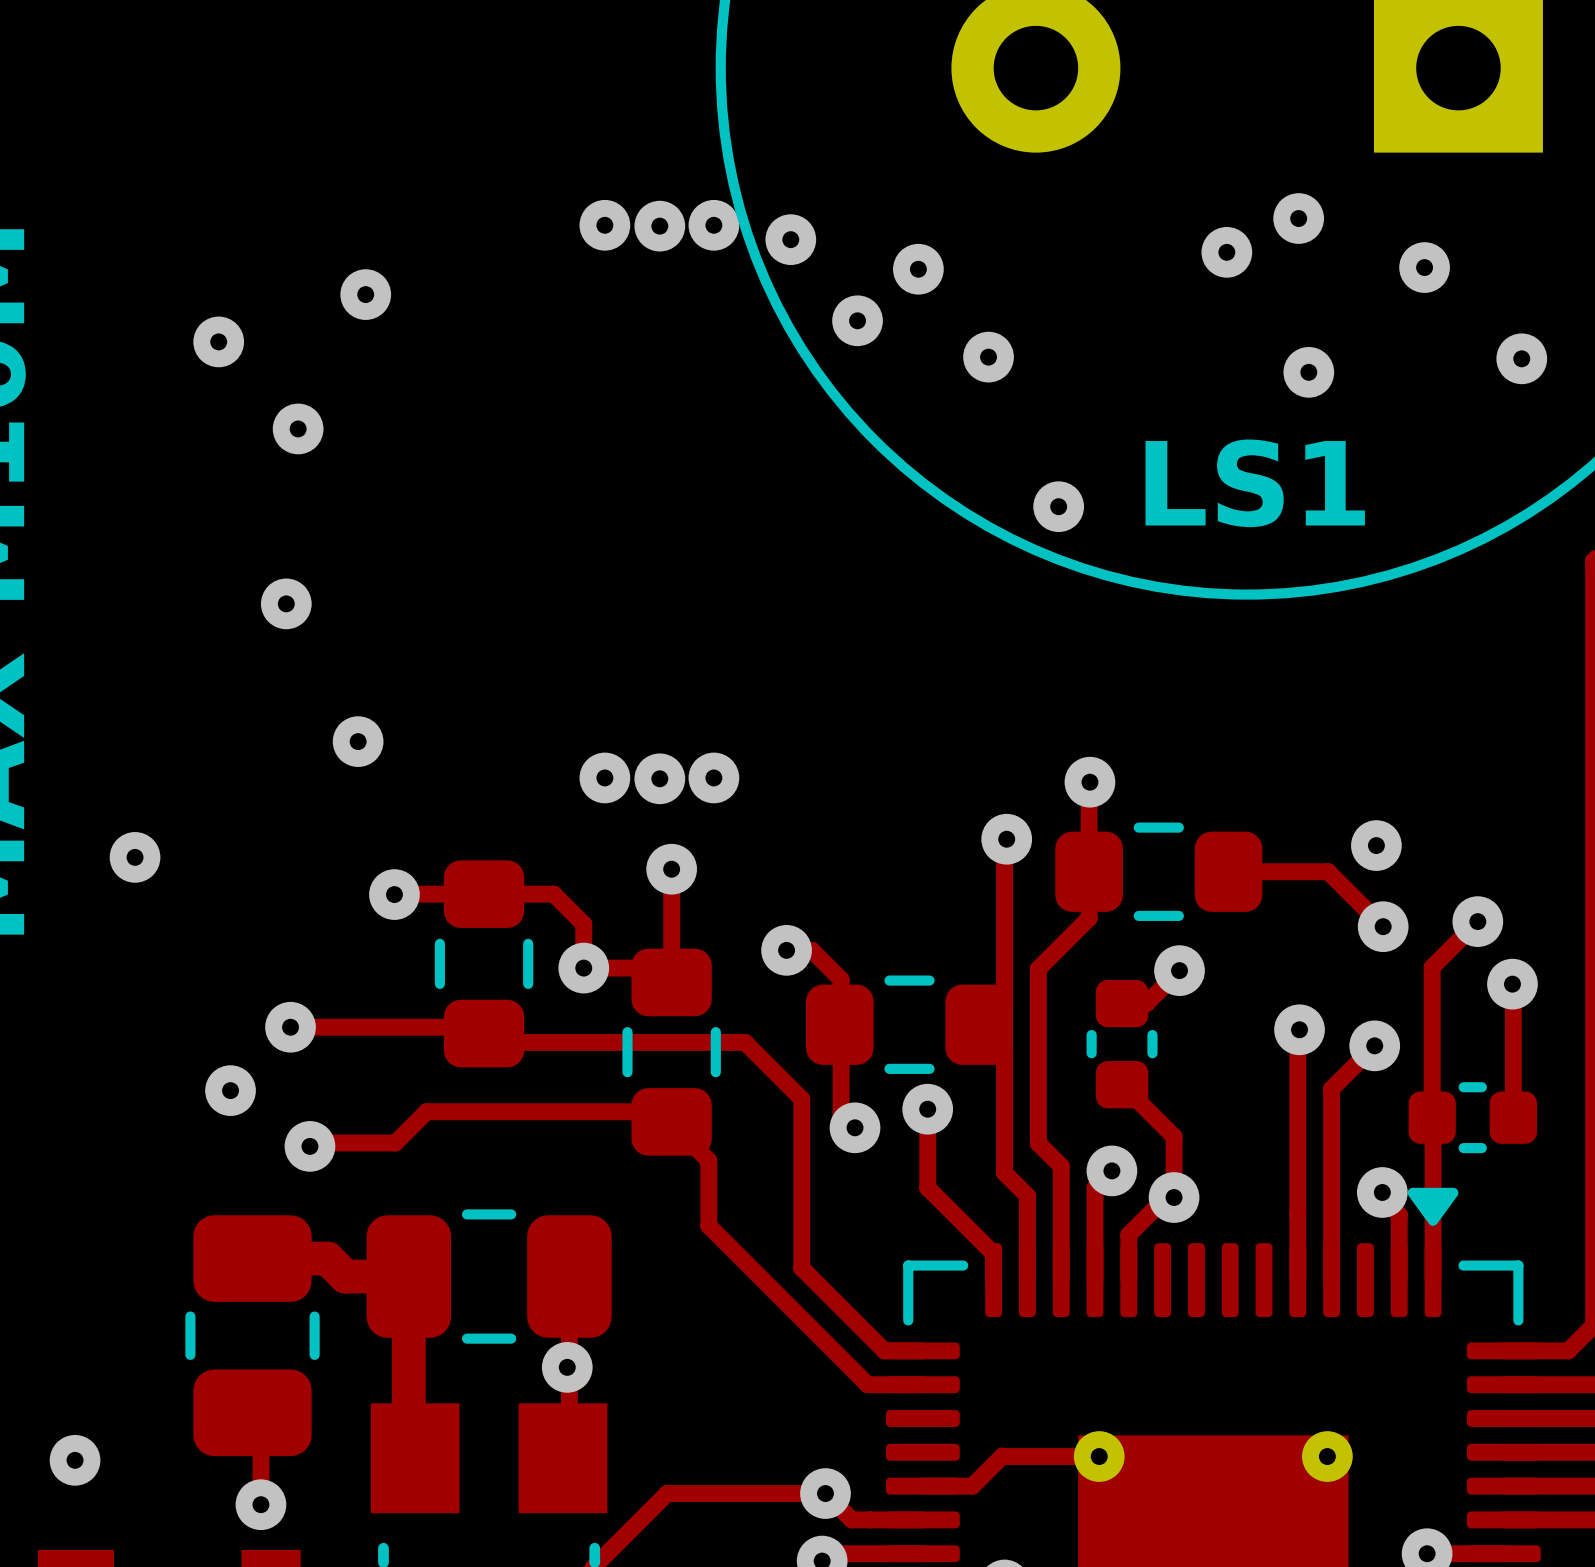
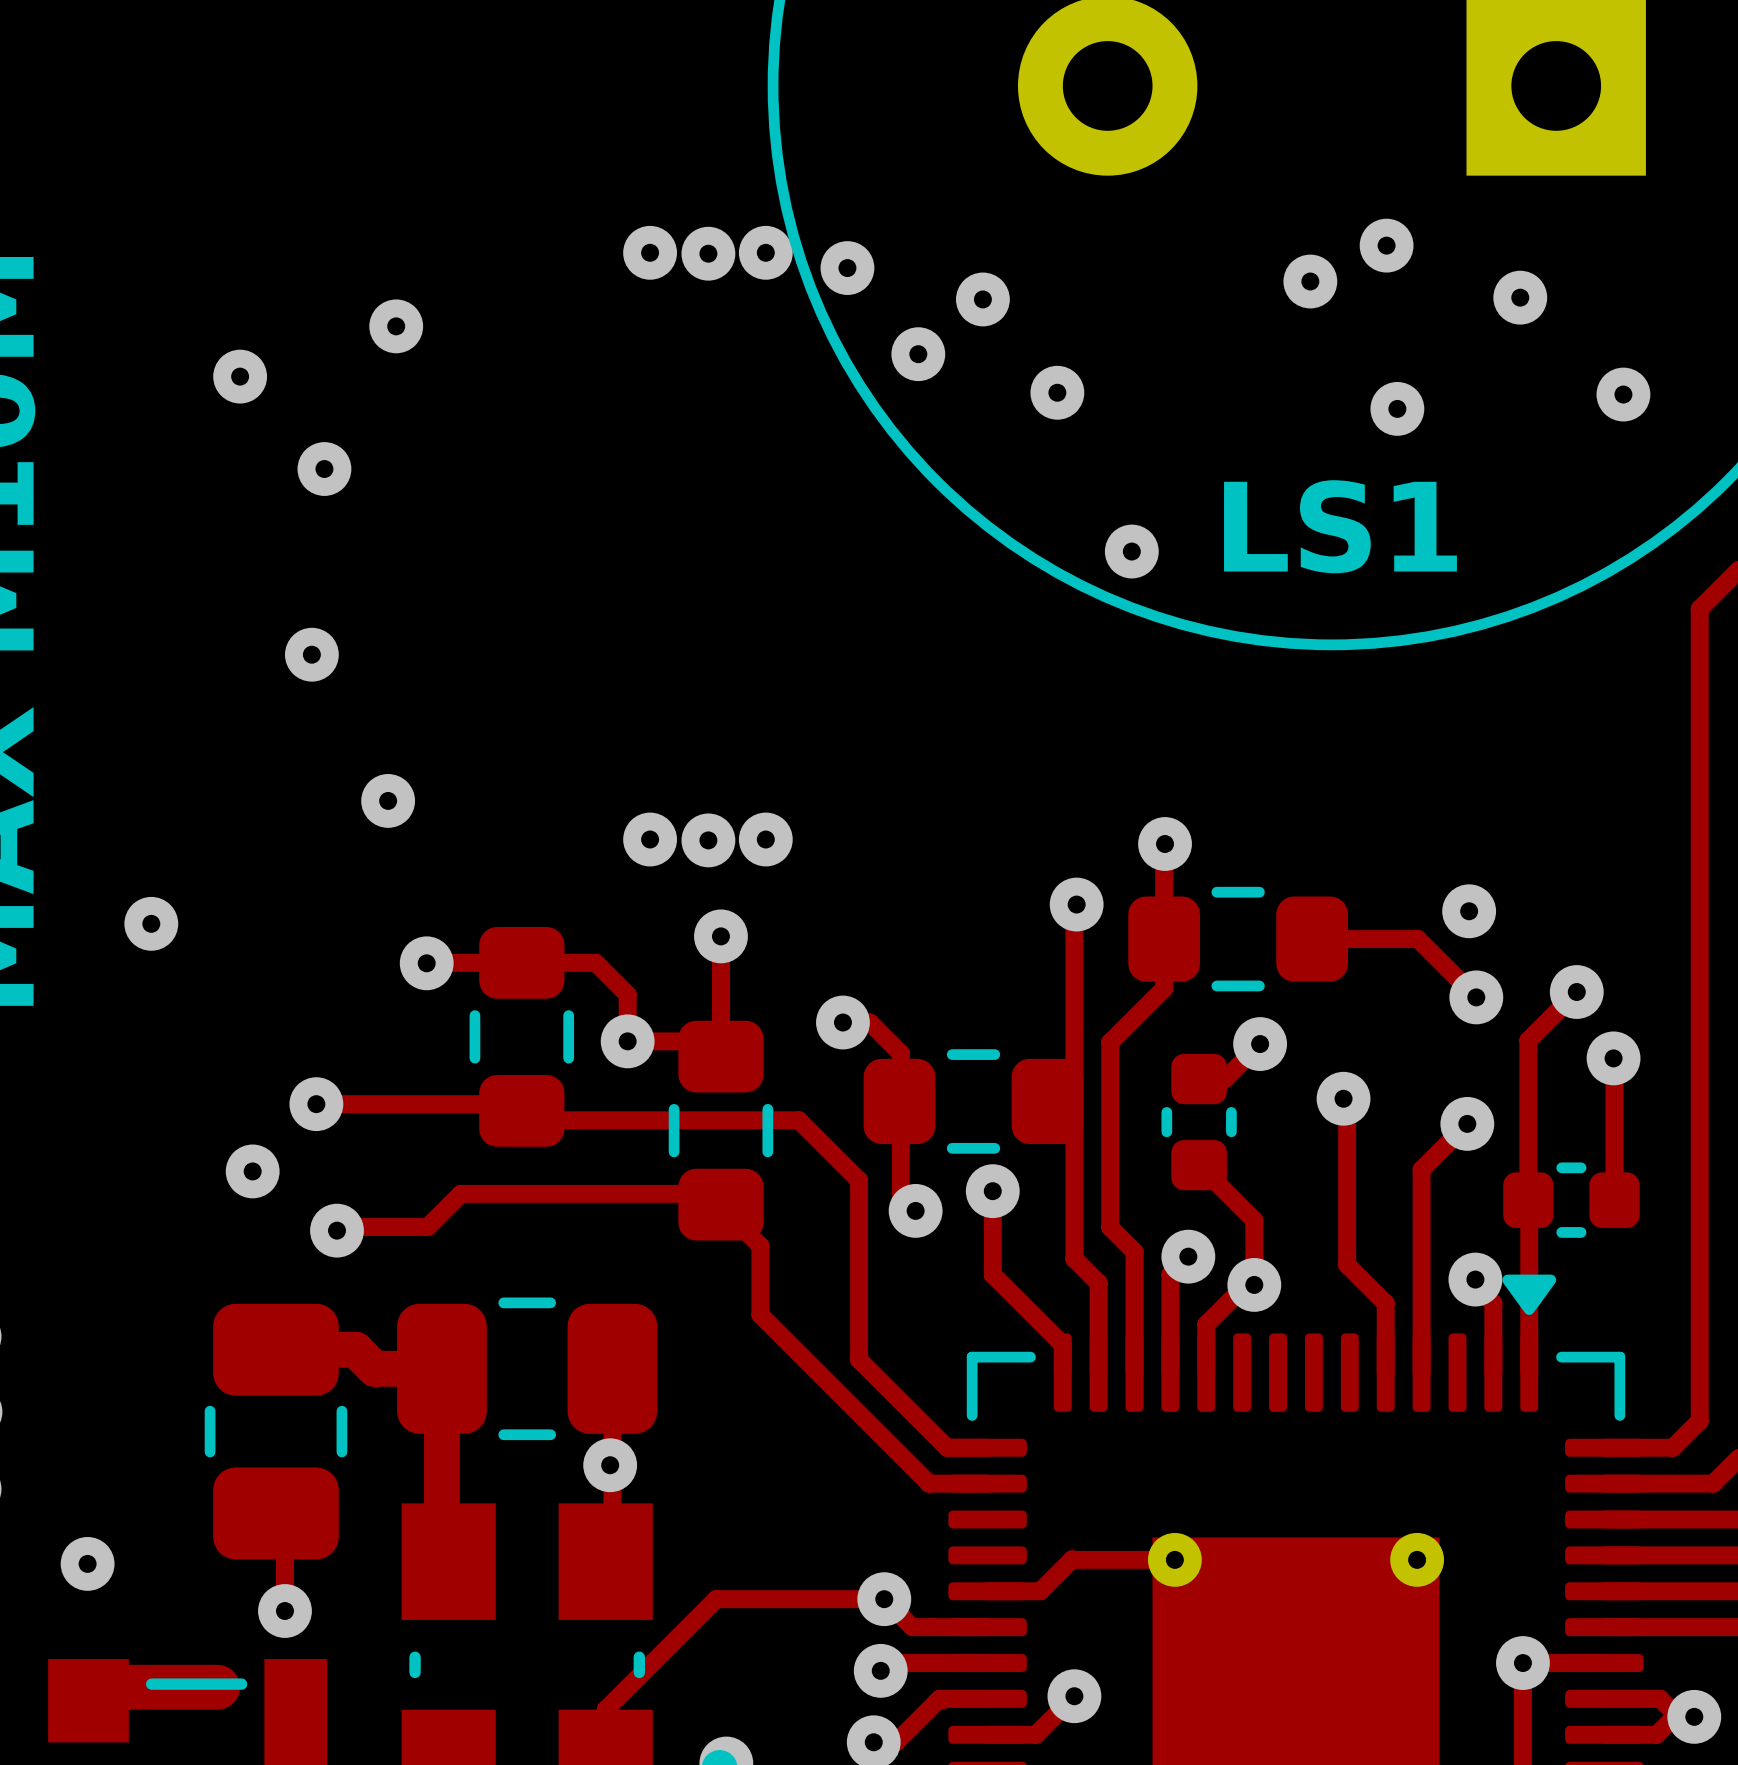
track: (1299, 1029) (1297, 1031) (1297, 1214) -> (1343, 1098) (1347, 1102) (1347, 1264) (1385, 1303)
via position: (1299, 1029) -> (1343, 1098)

